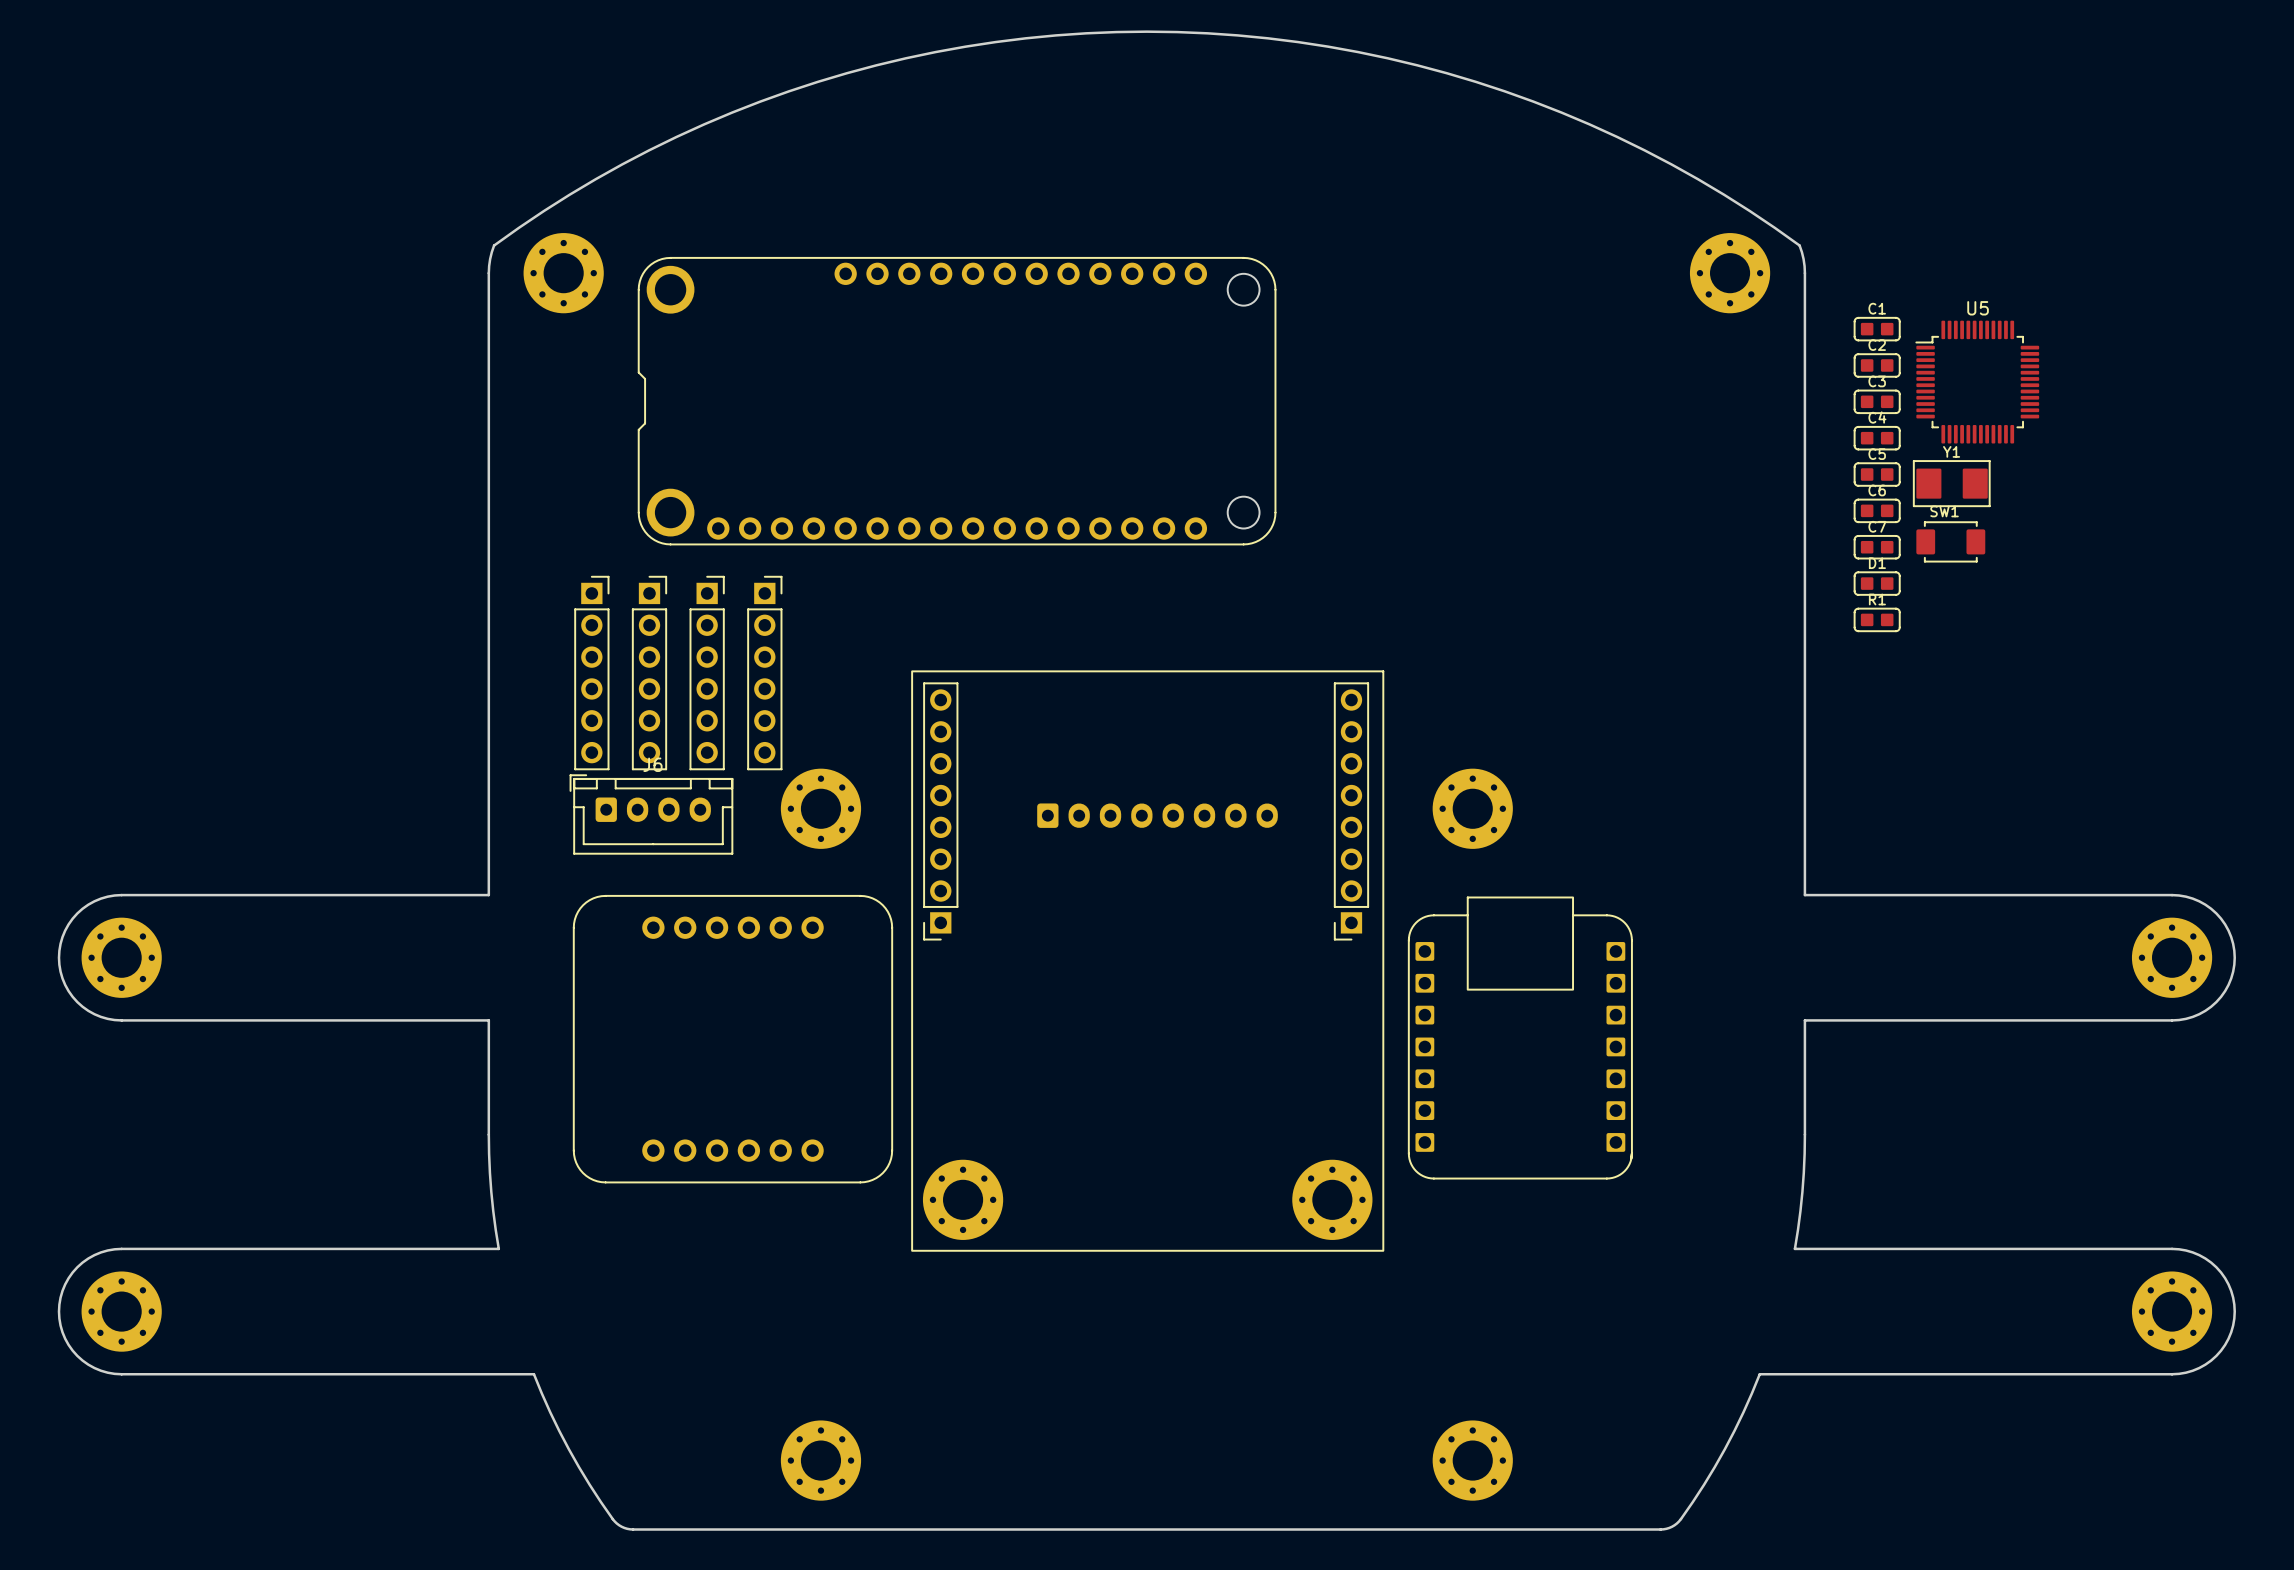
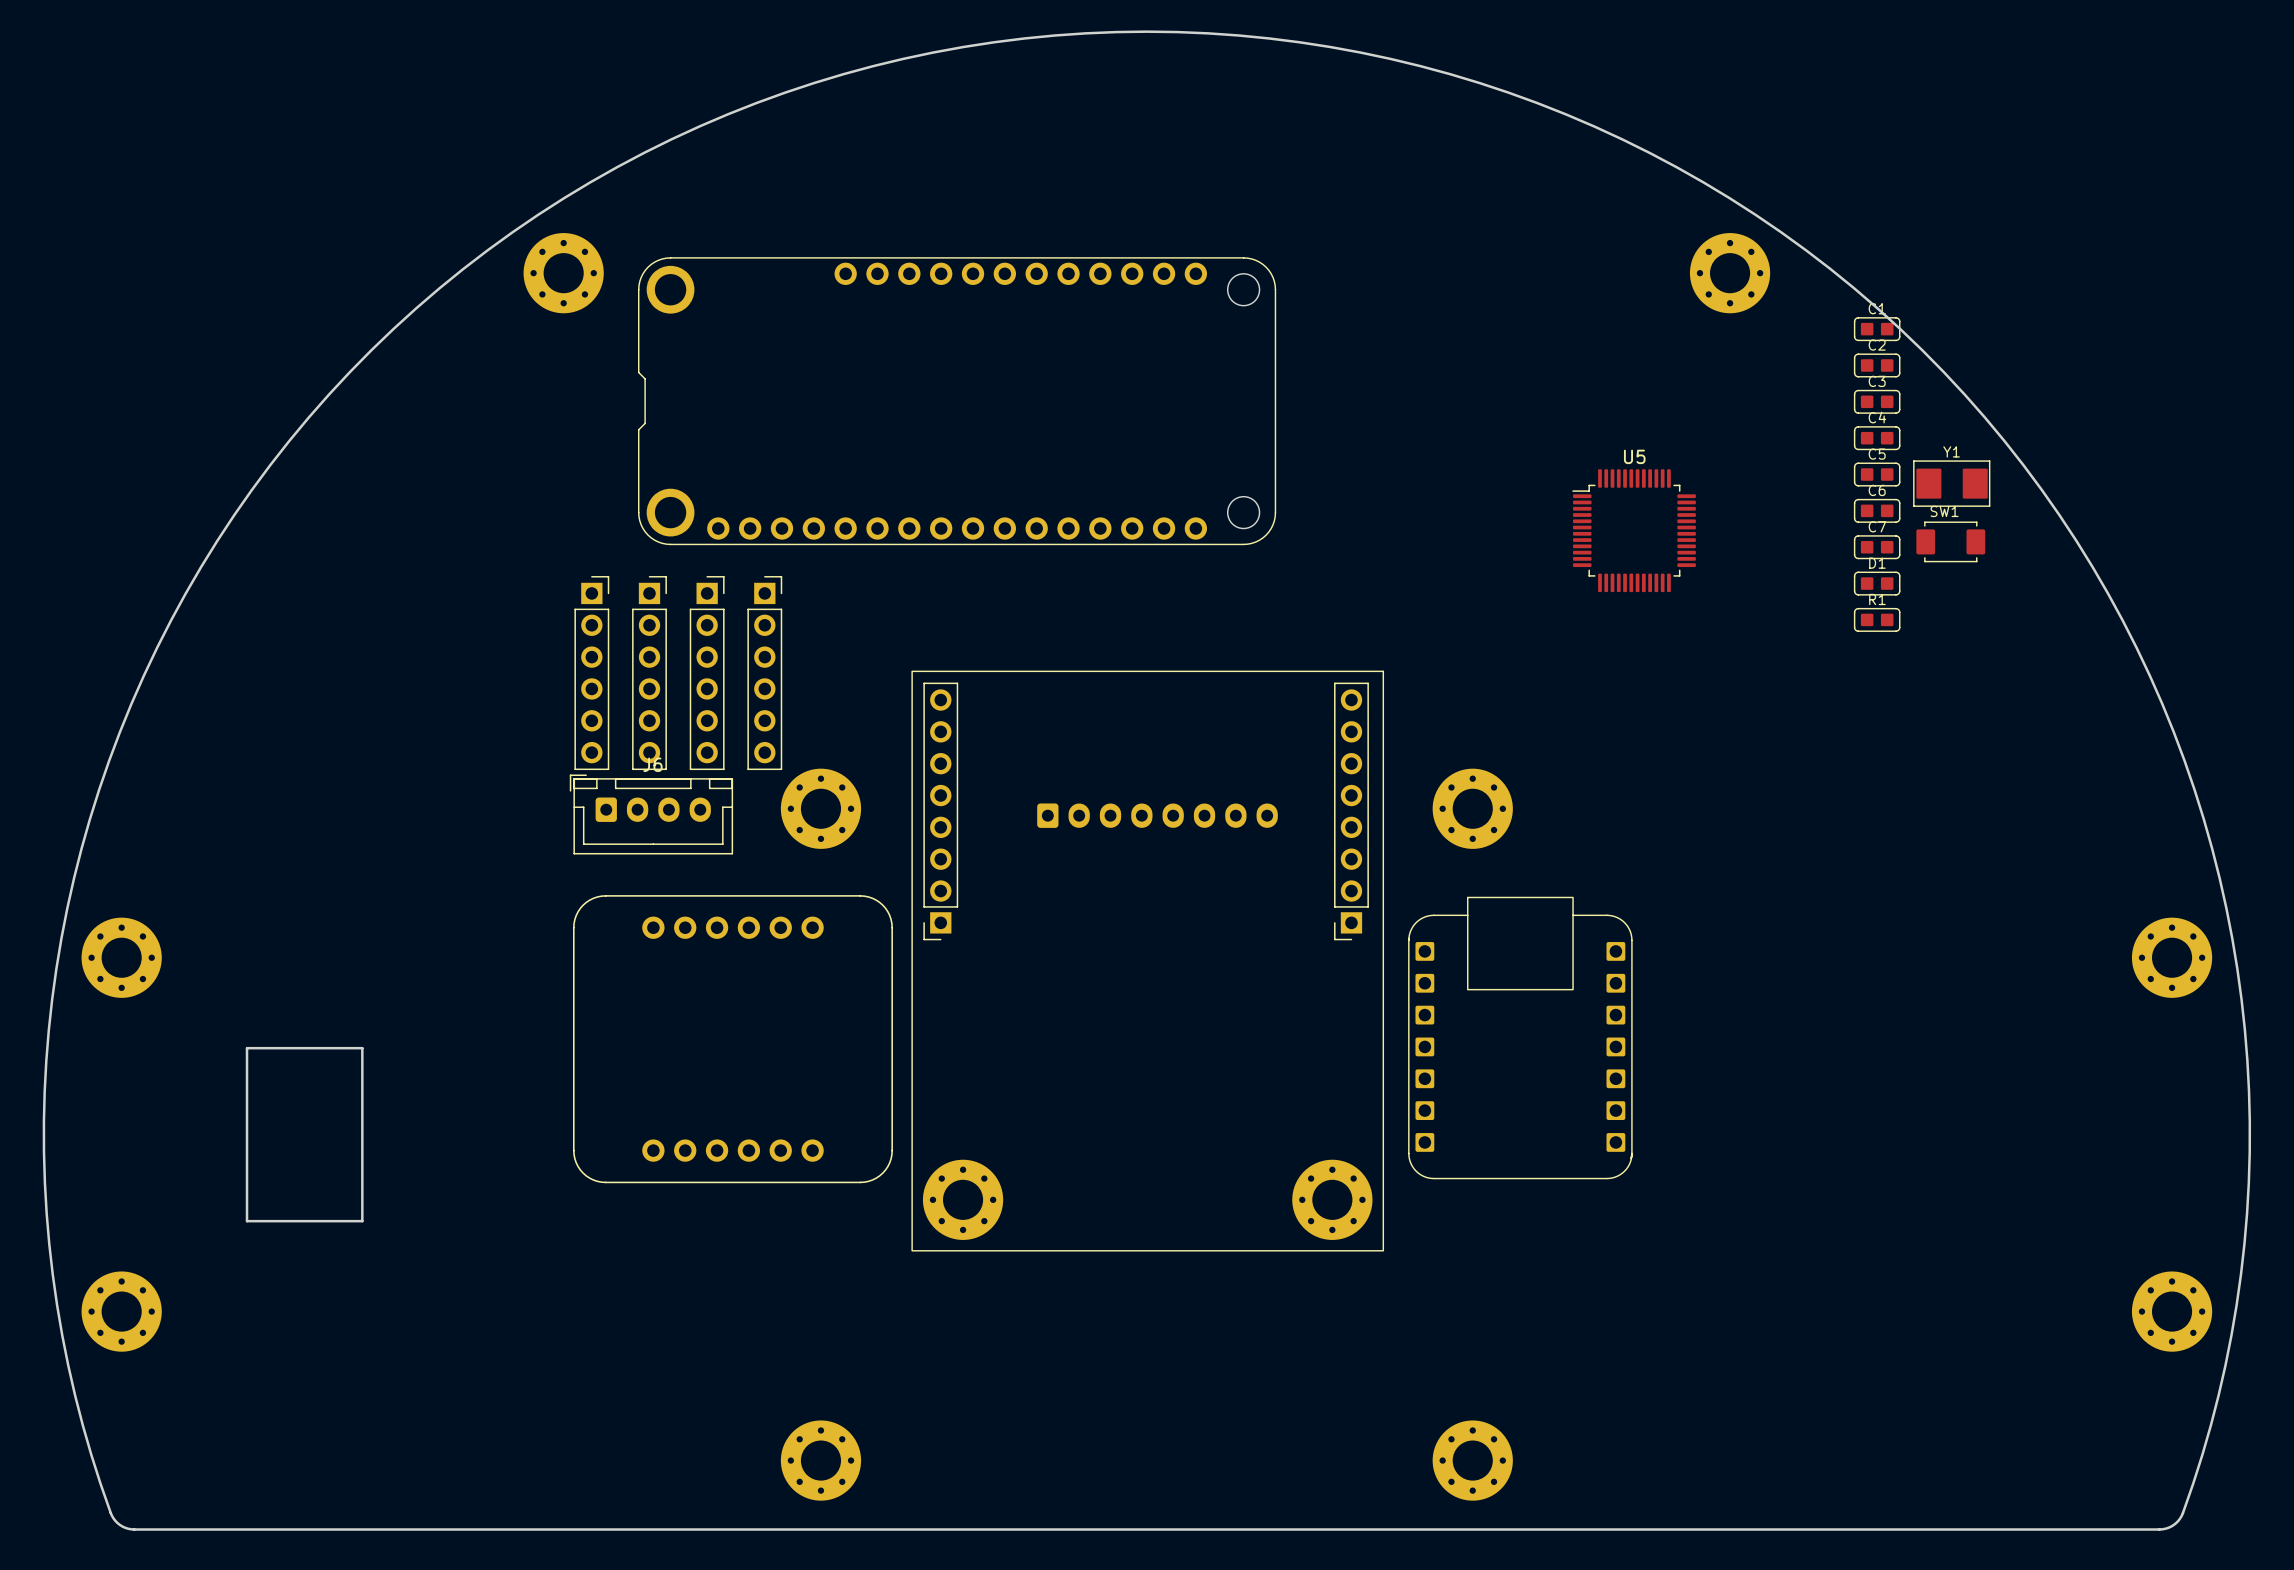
U5 position: (1977, 382) -> (1634, 530)
board edge: none -> (247, 1048) (362, 1048) (362, 1221) (247, 1221) (247, 1048)
board edge: (633, 1529) (621, 1526) (614, 1521) (589, 1484) (559, 1430) (533, 1374) (121, 1374) (100, 1370) (88, 1364) (77, 1355) (68, 1344) (60, 1325) (59, 1311) (60, 1297) (68, 1278) (77, 1267) (88, 1258) (107, 1250) (121, 1248) (498, 1248) (489, 1172) (488, 1020) (121, 1020) (107, 1018) (94, 1014) (82, 1006) (68, 991) (62, 978) (59, 964) (59, 950) (62, 937) (68, 924) (82, 908) (100, 898) (114, 895) (488, 895) (488, 273) (494, 245) (544, 210) (622, 164) (704, 124) (789, 91) (876, 65) (965, 46) (1055, 35) (1146, 31) (1237, 35) (1328, 46) (1417, 65) (1504, 91) (1589, 124) (1644, 150) (1724, 194) (1799, 245) (1804, 273) (1804, 895) (2179, 895) (2192, 898) (2211, 908) (2221, 918) (2231, 937) (2234, 950) (2234, 964) (2231, 978) (2225, 991) (2211, 1006) (2199, 1014) (2186, 1018) (2172, 1020) (1804, 1020) (1803, 1172) (1794, 1248) (2172, 1248) (2186, 1250) (2205, 1258) (2216, 1267) (2225, 1278) (2231, 1290) (2234, 1311) (2233, 1325) (2225, 1344) (2216, 1355) (2205, 1364) (2192, 1370) (2172, 1374) (1759, 1374) (1734, 1430) (1704, 1484) (1679, 1521) (1672, 1526) (1660, 1529) -> (633, 1529) (134, 1529) (122, 1526) (113, 1518) (82, 1425) (62, 1335) (49, 1244) (43, 1152) (46, 1060) (56, 968) (74, 878) (99, 789) (131, 703) (157, 647) (201, 566) (251, 489) (308, 417) (371, 350) (439, 288) (487, 250) (563, 198) (644, 152) (699, 126) (785, 92) (873, 66) (963, 47) (1054, 35) (1146, 31) (1238, 35) (1330, 47) (1390, 58) (1479, 82) (1565, 114) (1649, 152) (1729, 198) (1805, 250) (1854, 288) (1922, 350) (1984, 417) (2041, 489) (2092, 566) (2122, 620) (2162, 703) (2194, 789) (2219, 878) (2237, 968) (2247, 1060) (2249, 1152) (2244, 1244) (2231, 1335) (2210, 1425) (2180, 1518) (2171, 1526) (2159, 1529) (1660, 1529)

